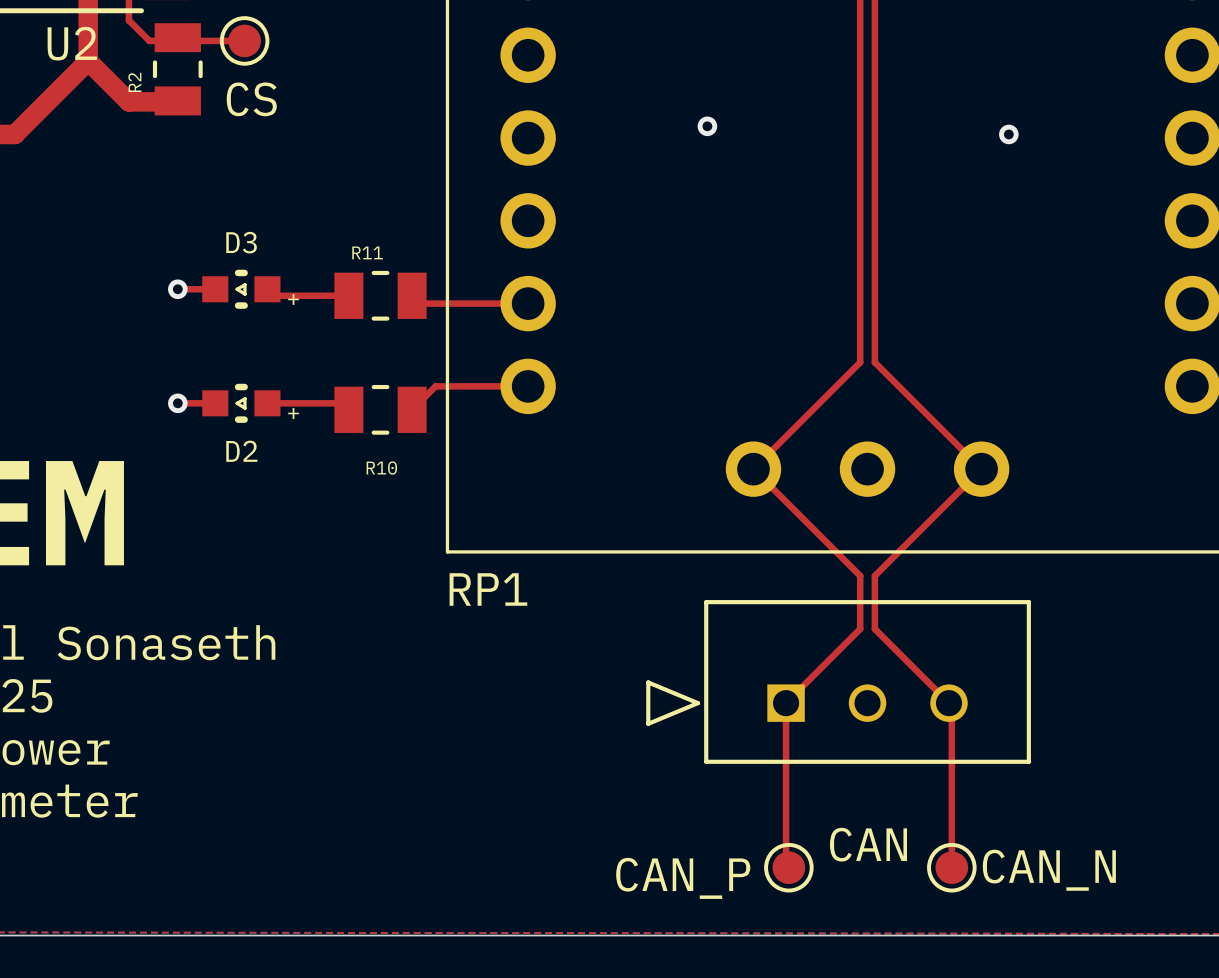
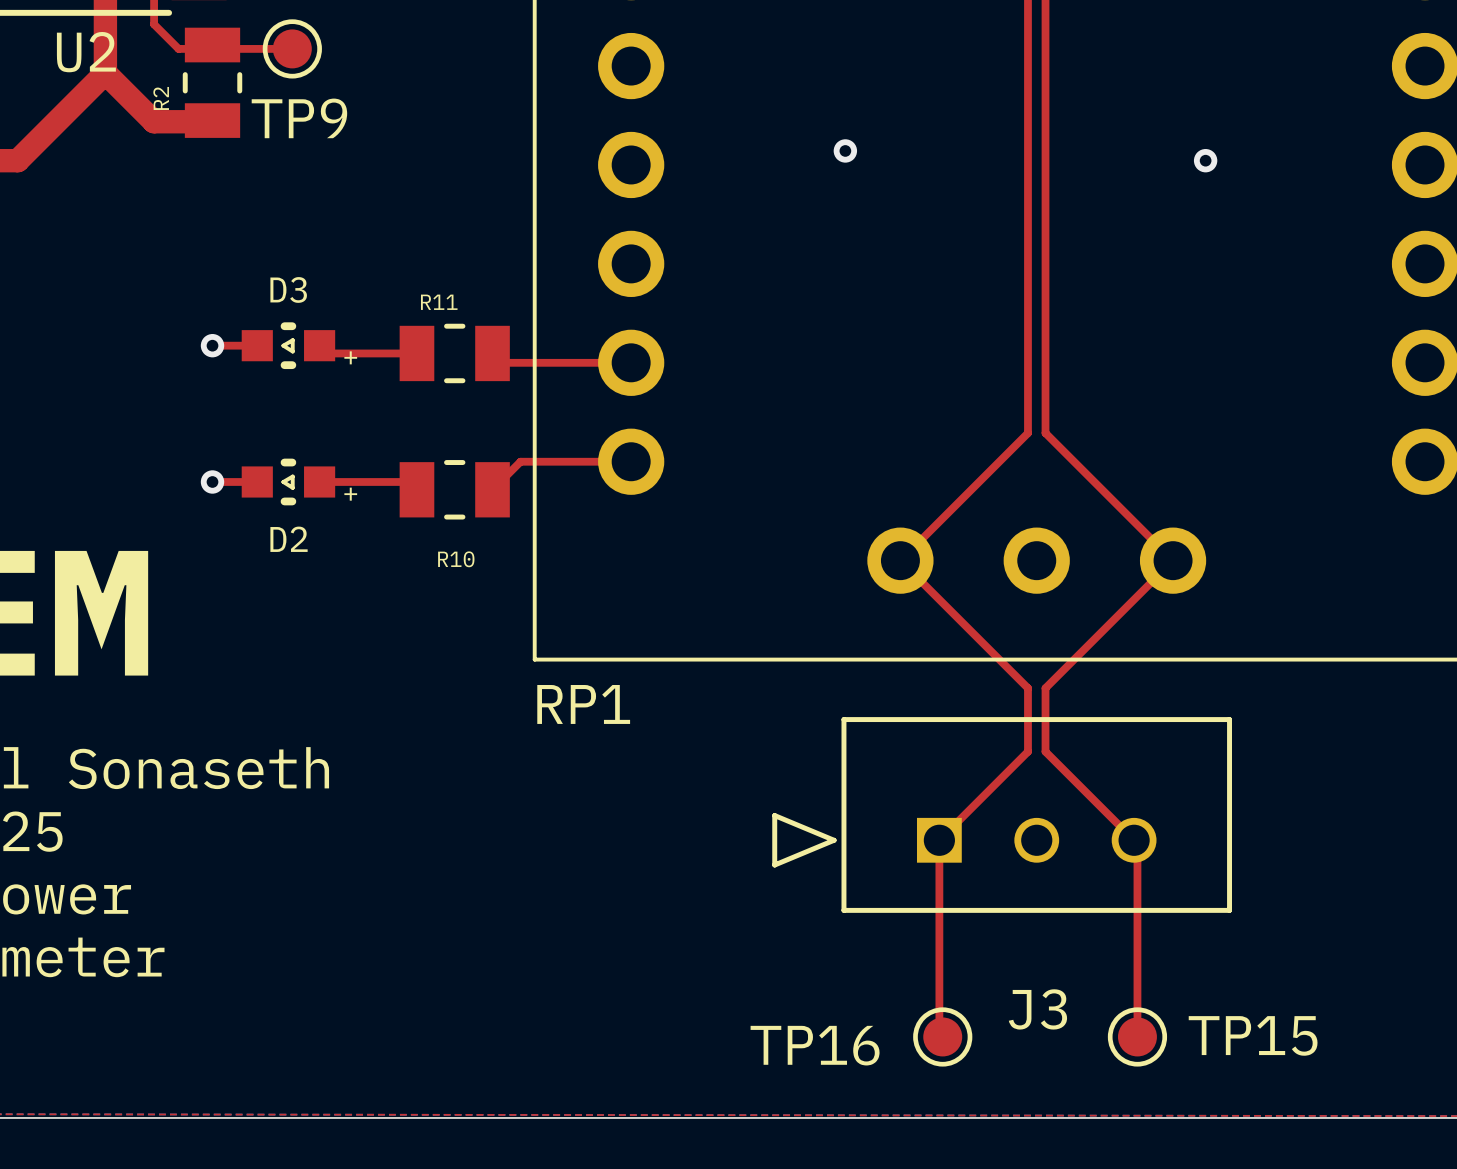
CS name: CS (251, 99) -> TP9 (299, 118)
CAN name: CAN (868, 844) -> J3 (1037, 1009)
CAN_N name: CAN_N (1049, 870) -> TP15 (1253, 1035)
CAN_P name: CAN_P (683, 878) -> TP16 (815, 1045)

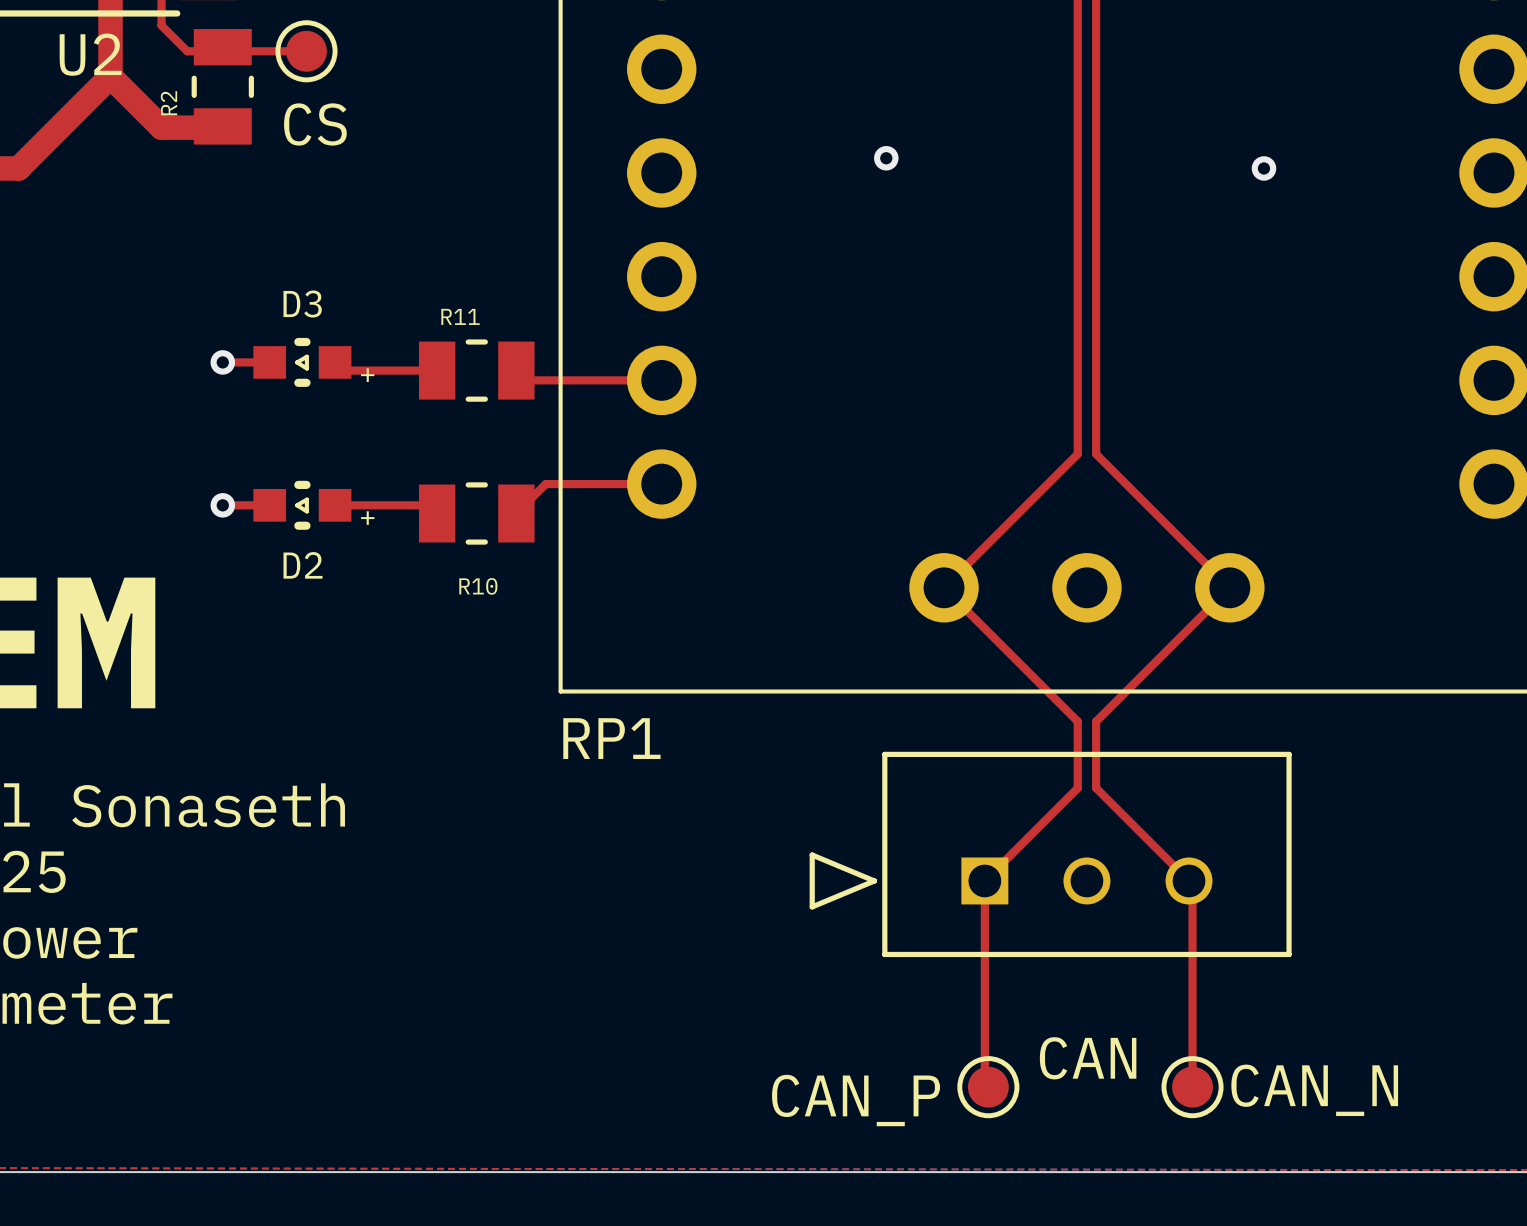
TP9 name: TP9 (299, 118) -> CS (315, 124)
J3 name: J3 (1037, 1009) -> CAN (1088, 1058)
TP15 name: TP15 (1253, 1035) -> CAN_N (1314, 1090)
TP16 name: TP16 (815, 1045) -> CAN_P (856, 1100)

